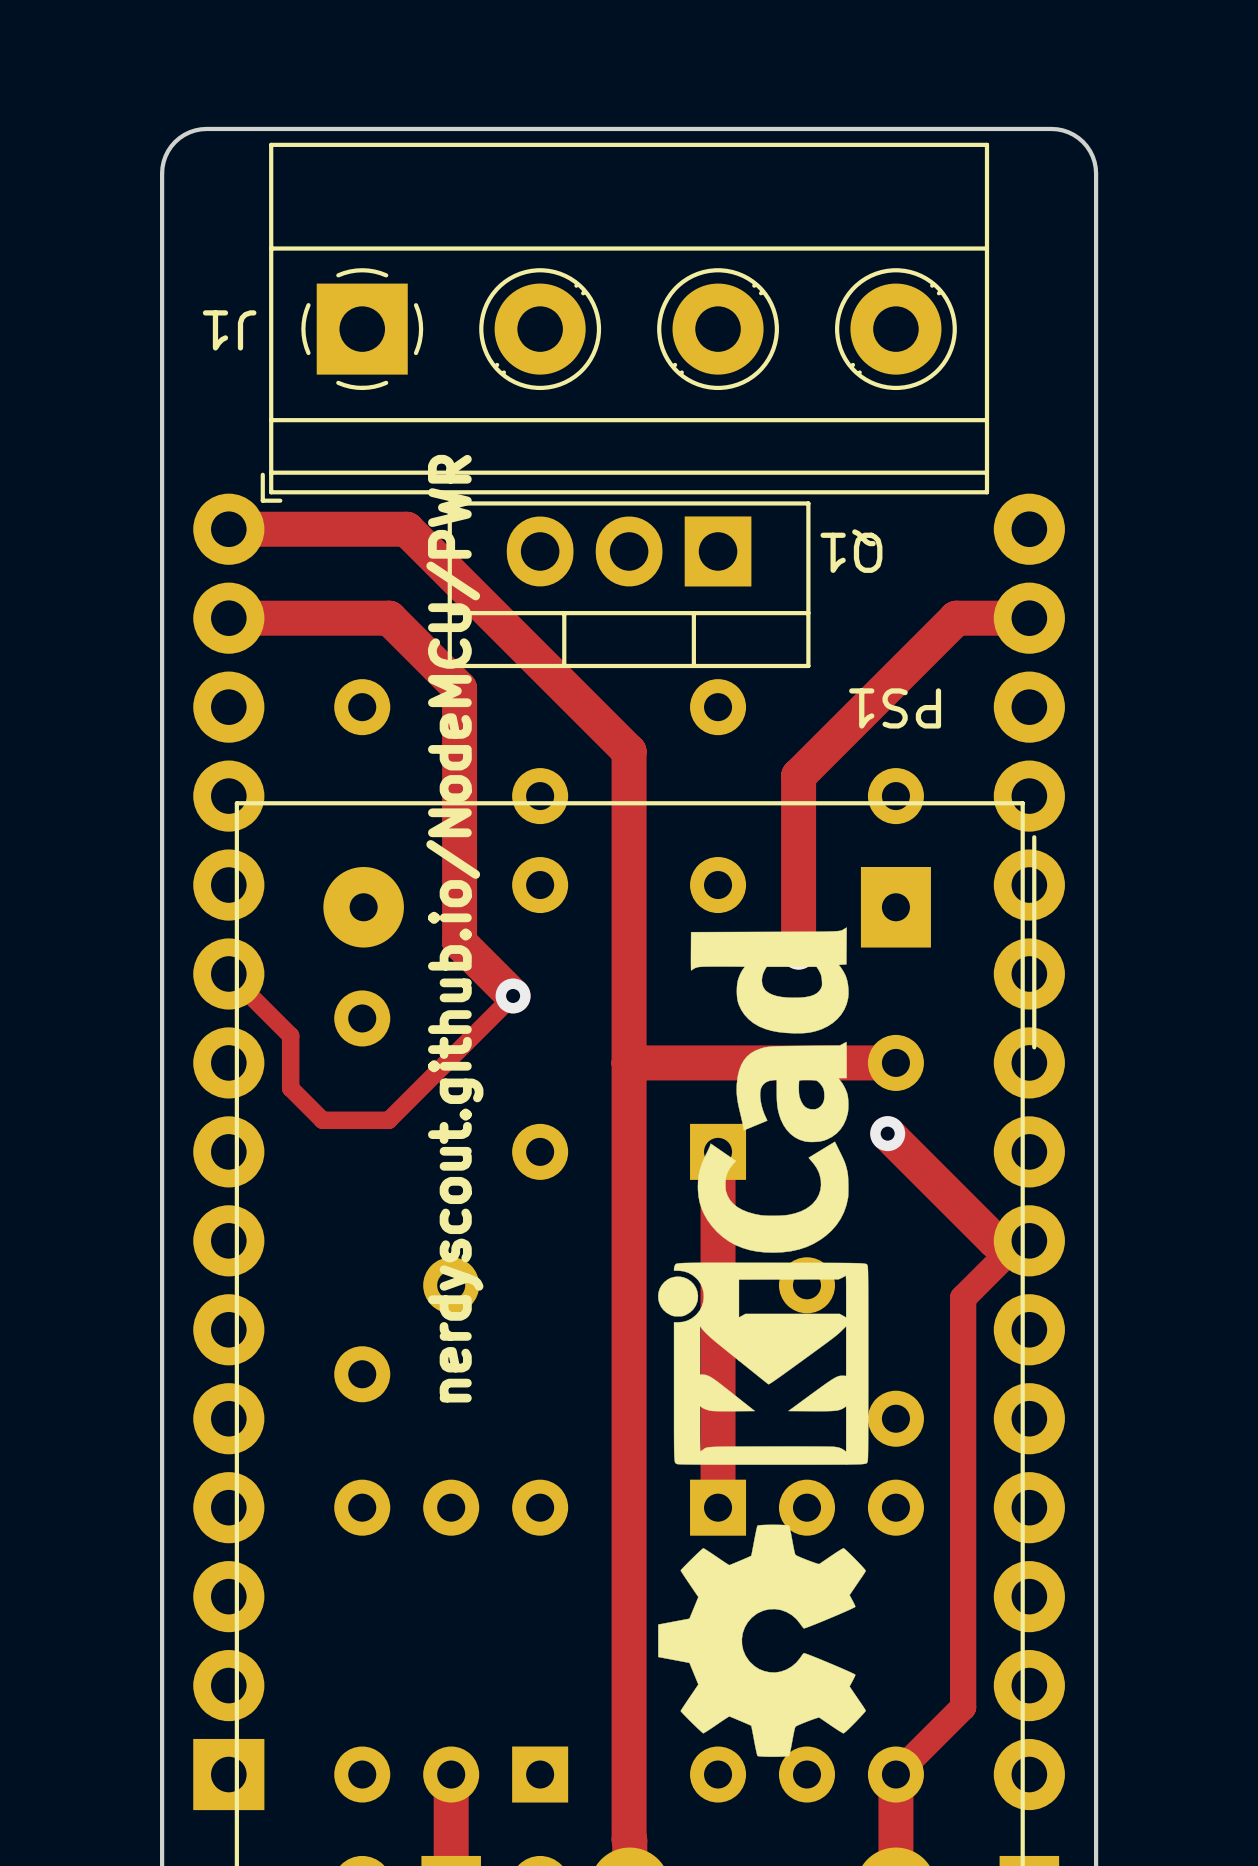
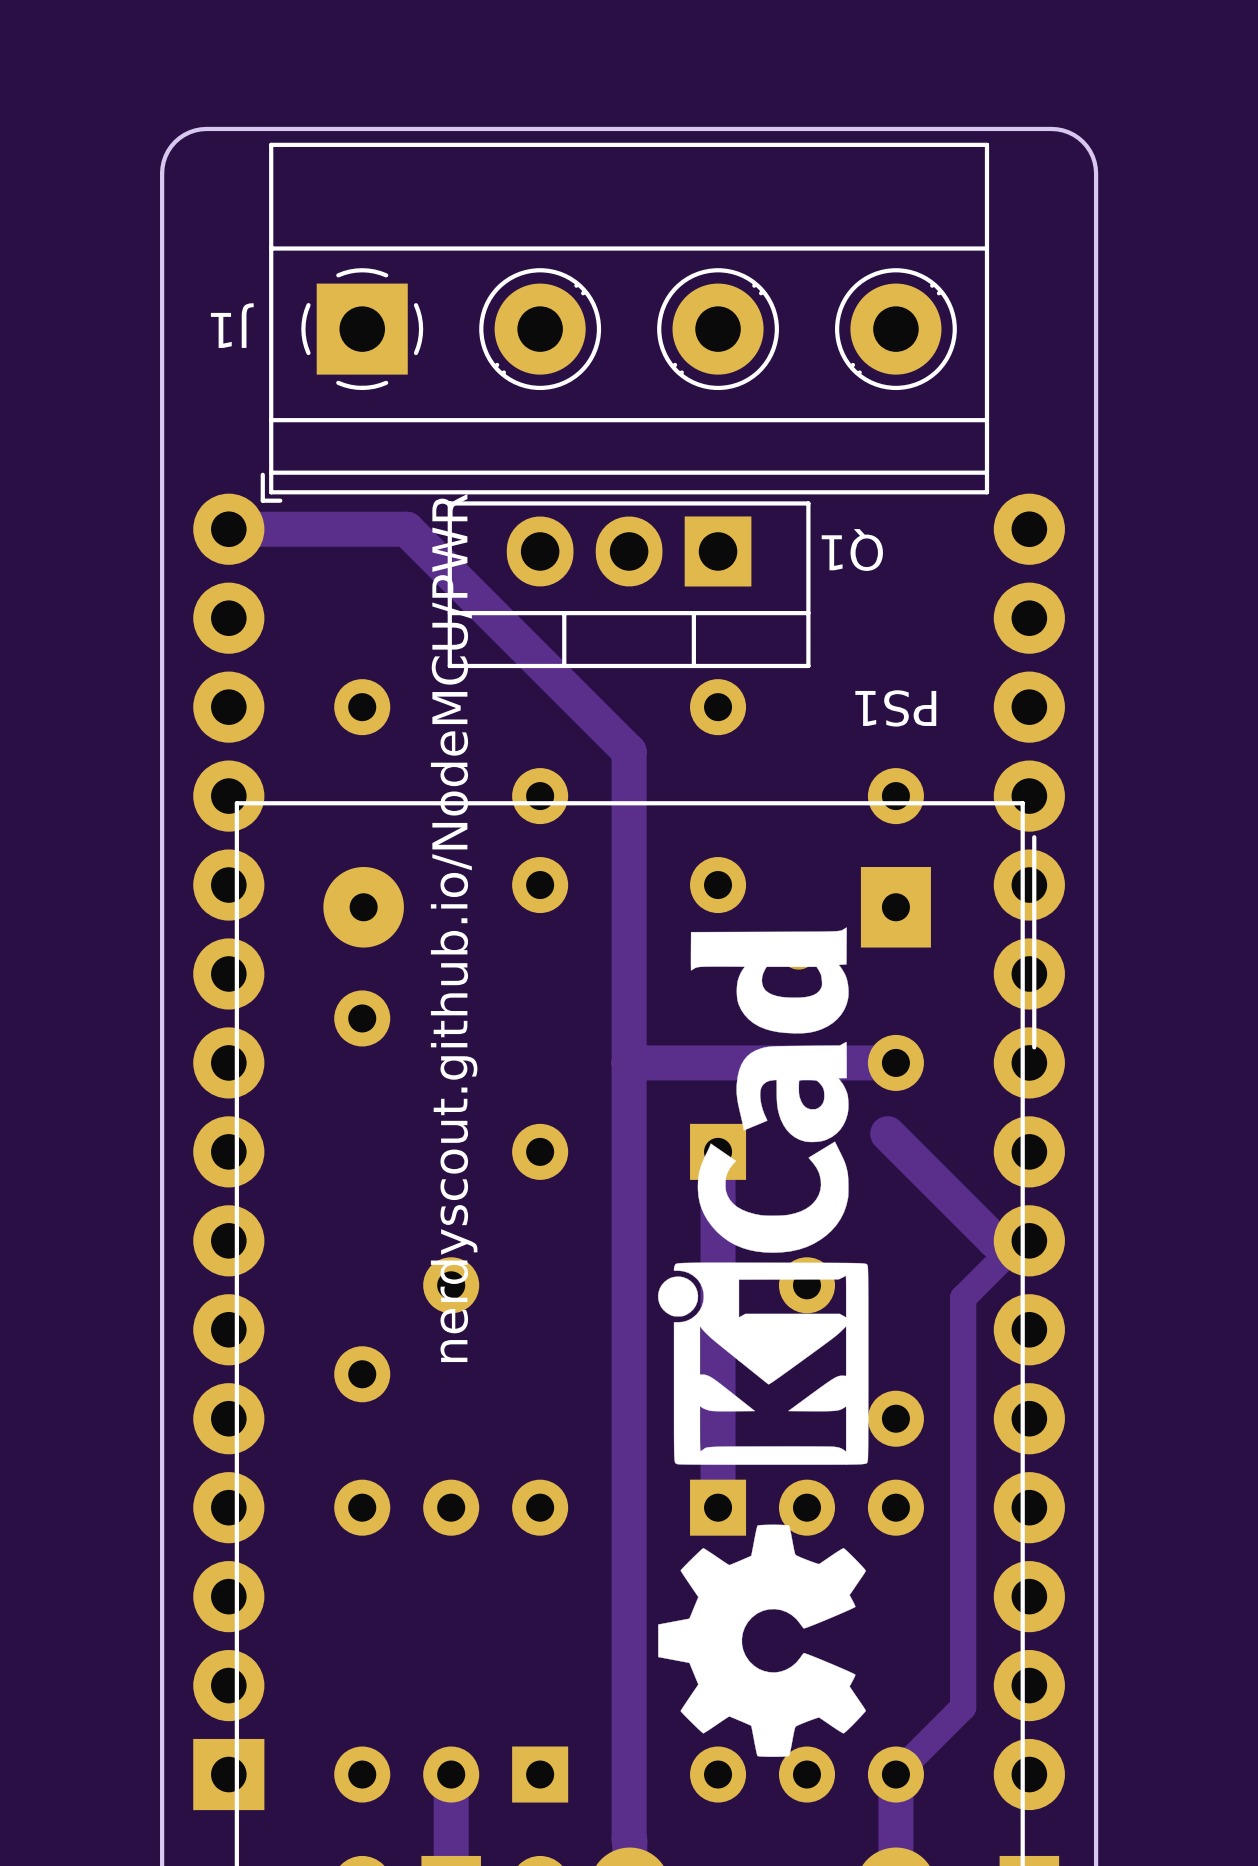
track: (228, 618) (389, 618) (459, 688) (459, 942) (513, 995) (388, 1120) (322, 1120) (290, 1088) (290, 1035) (228, 973) -> none
track: (1029, 618) (956, 618) (798, 775) (798, 952) -> none
via: (513, 995) -> none
via: (887, 1133) -> none

